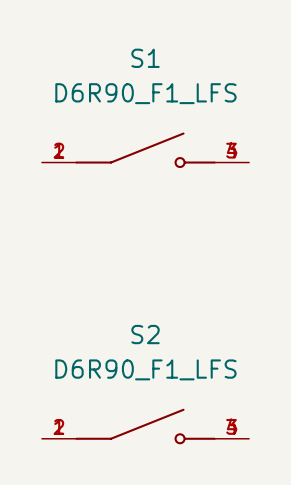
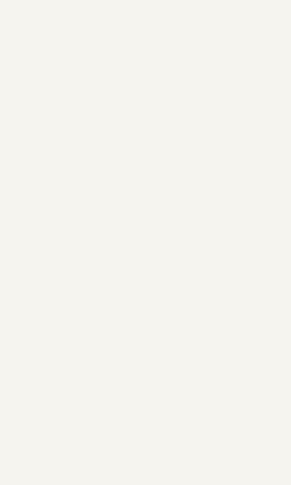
S1: D6R90_F1_LFS (145, 150) -> none
S2: D6R90_F1_LFS (145, 426) -> none

